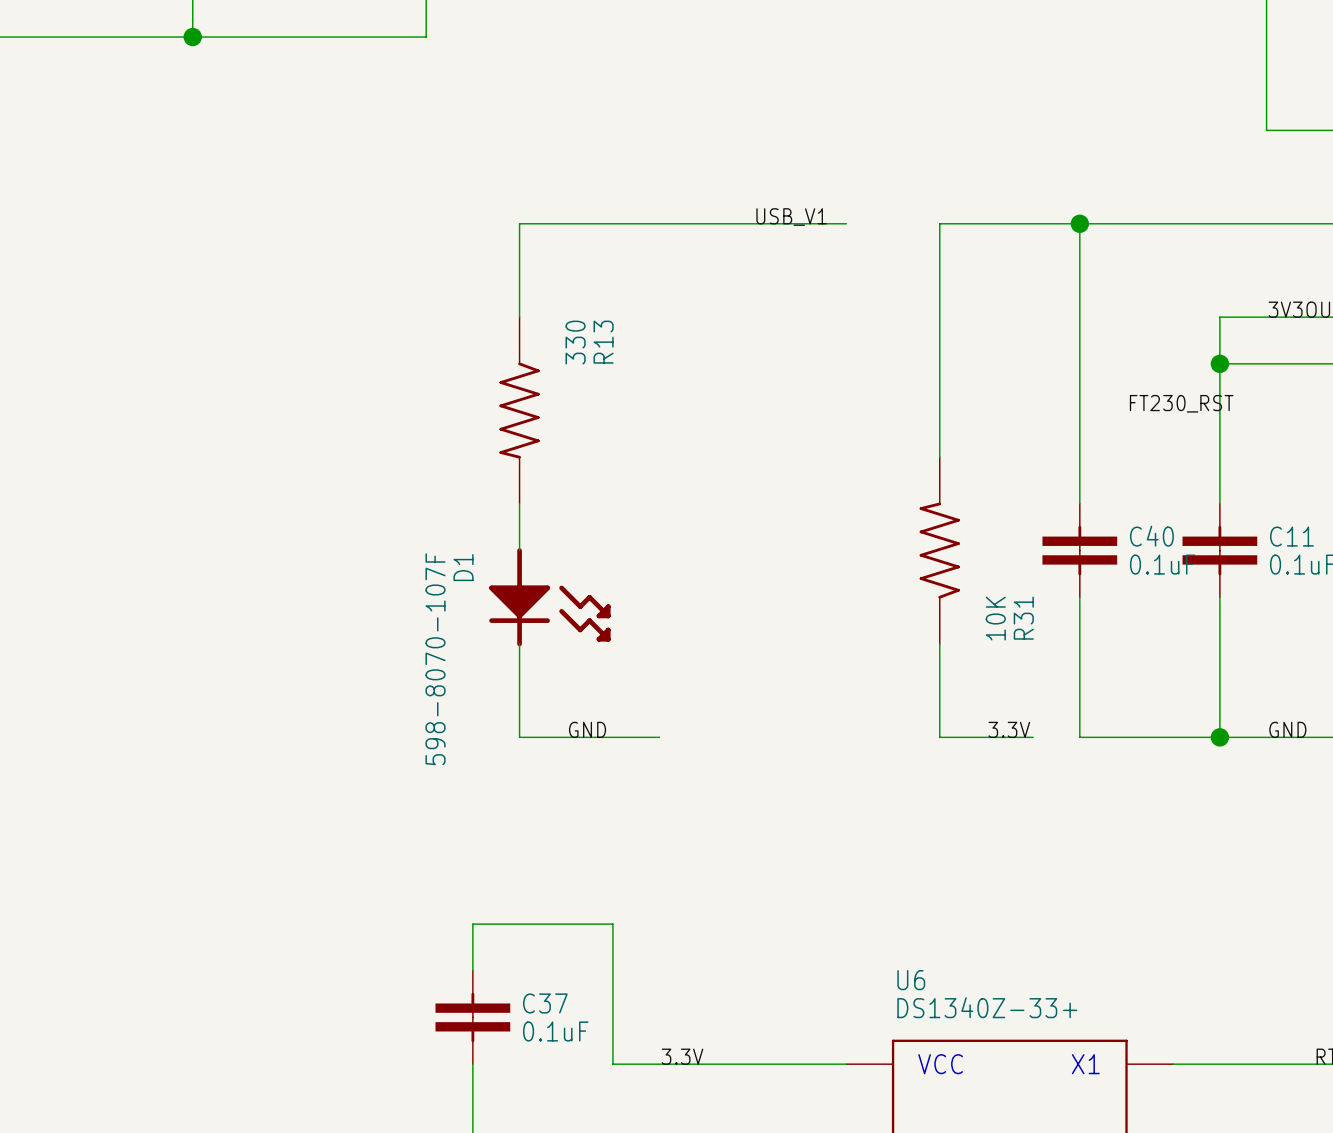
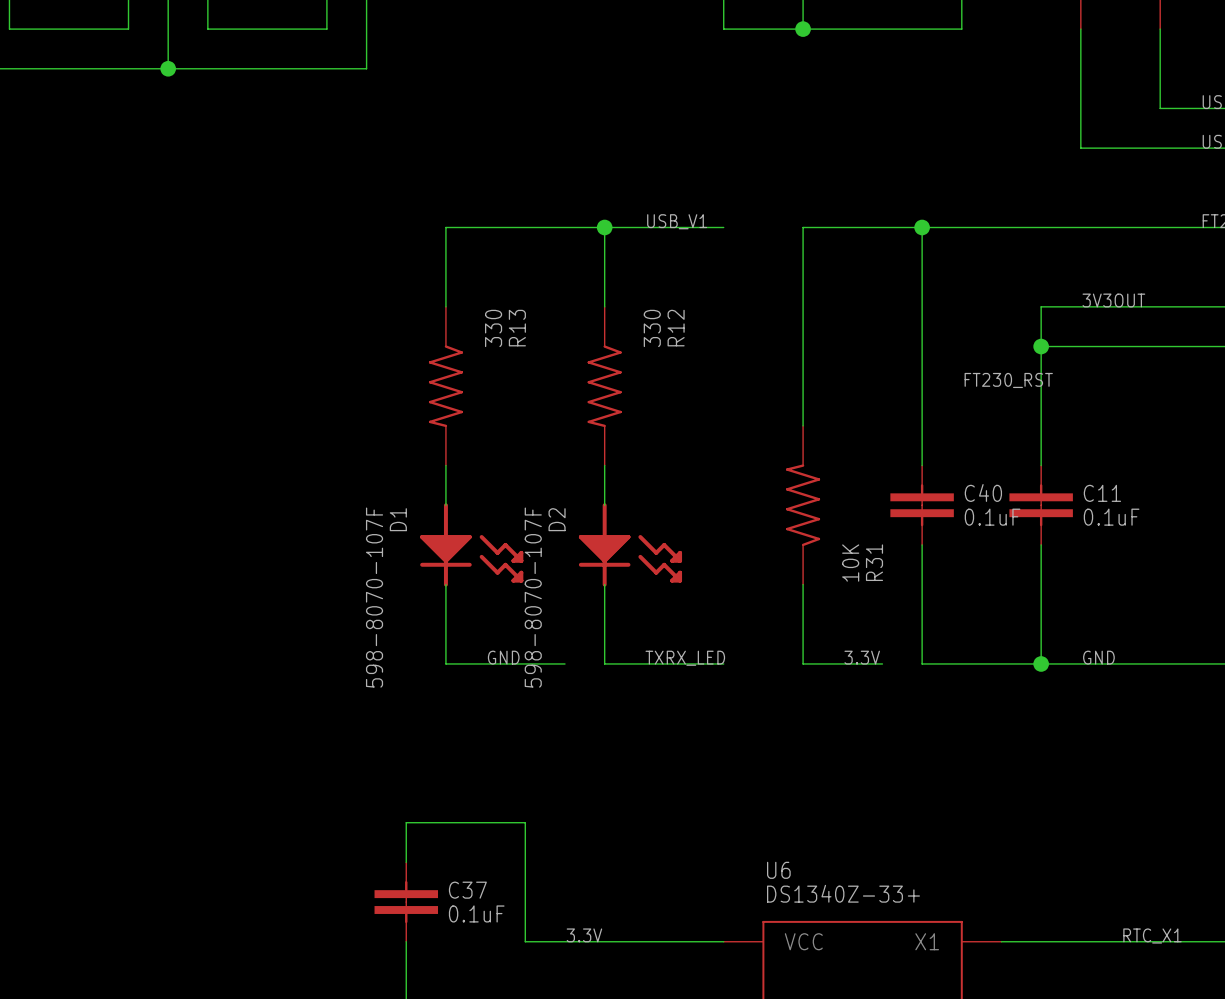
wire: none -> (604, 227) (604, 306)
junction: none -> (604, 227)
R12: none -> 330 (604, 386)
wire: none -> (604, 465) (604, 505)
D2: none -> 598-8070-107F (630, 544)
wire: none -> (604, 584) (604, 663) (723, 663)
label: none -> TXRX_LED (685, 658)

